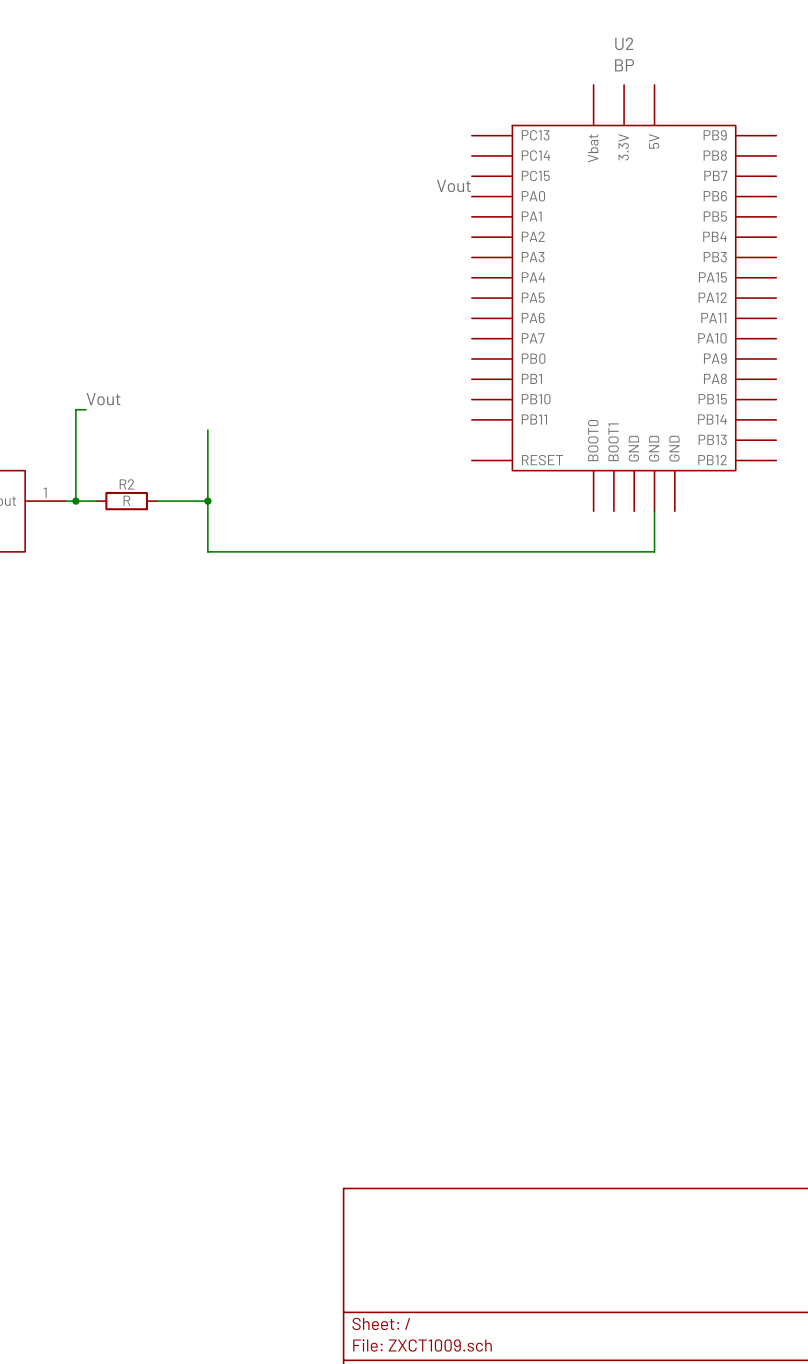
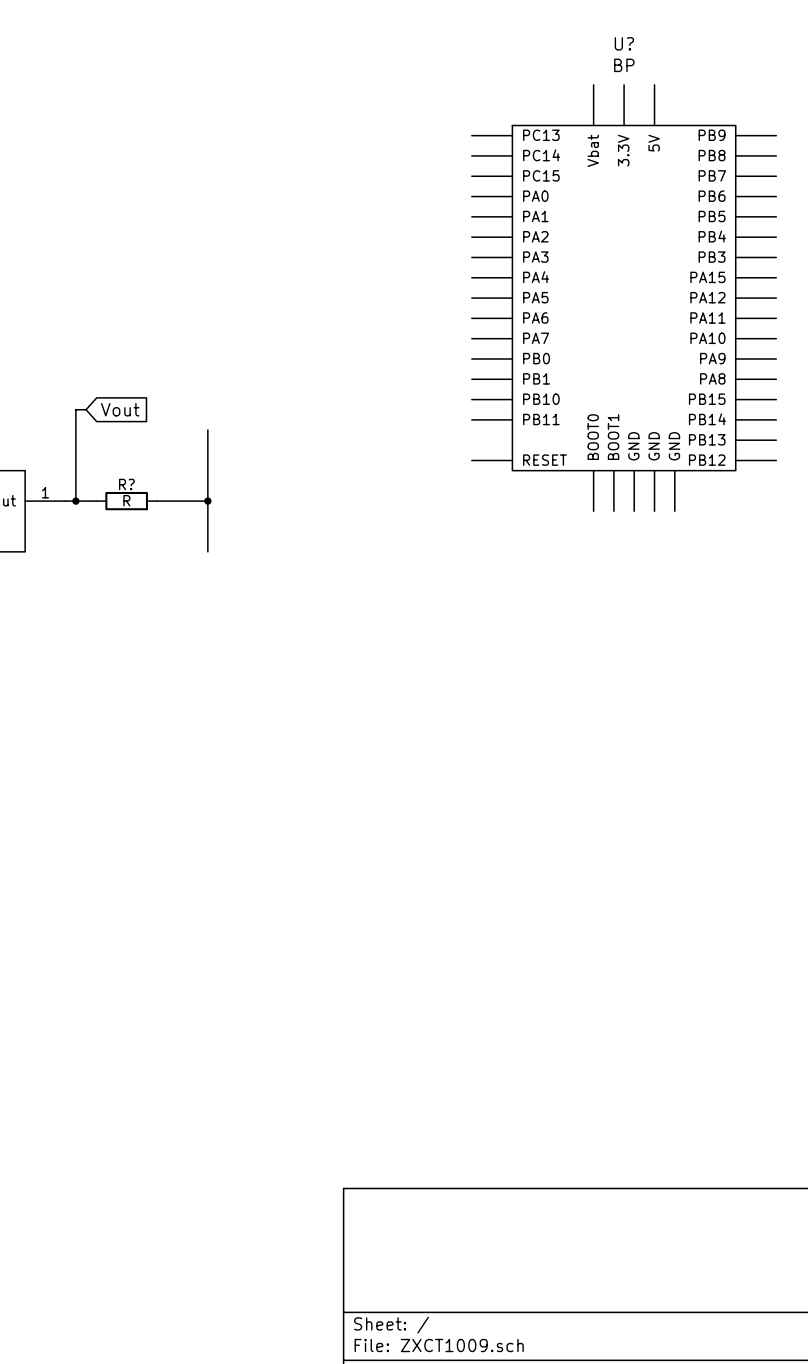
U2 name: U2 (624, 43) -> U? (624, 43)
label: Vout (453, 186) -> none
label: Vout (103, 399) -> none
global label: none -> Vout (120, 409)
R2 name: R2 (126, 484) -> R? (126, 484)
wire: (654, 511) (654, 551) (207, 551) -> none

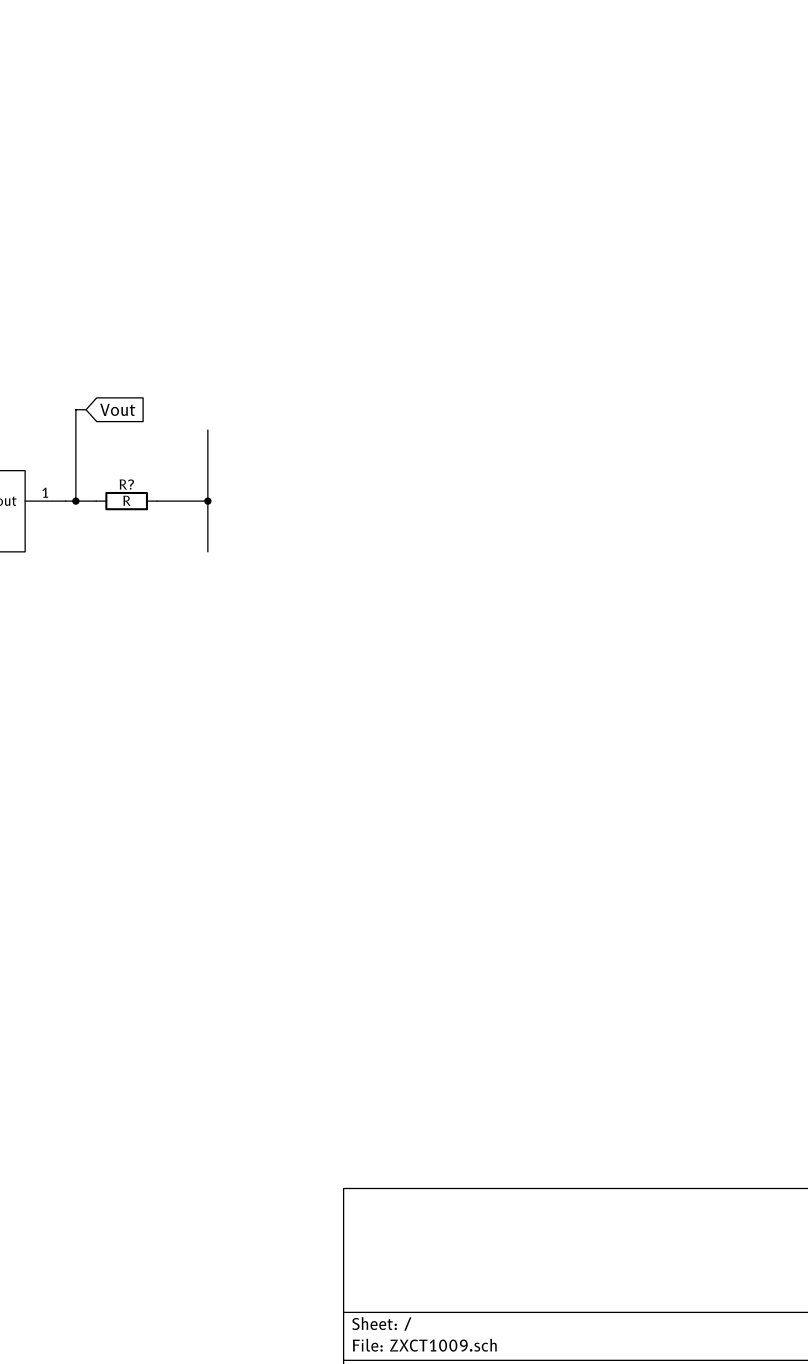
U?: BP (624, 298) -> none

